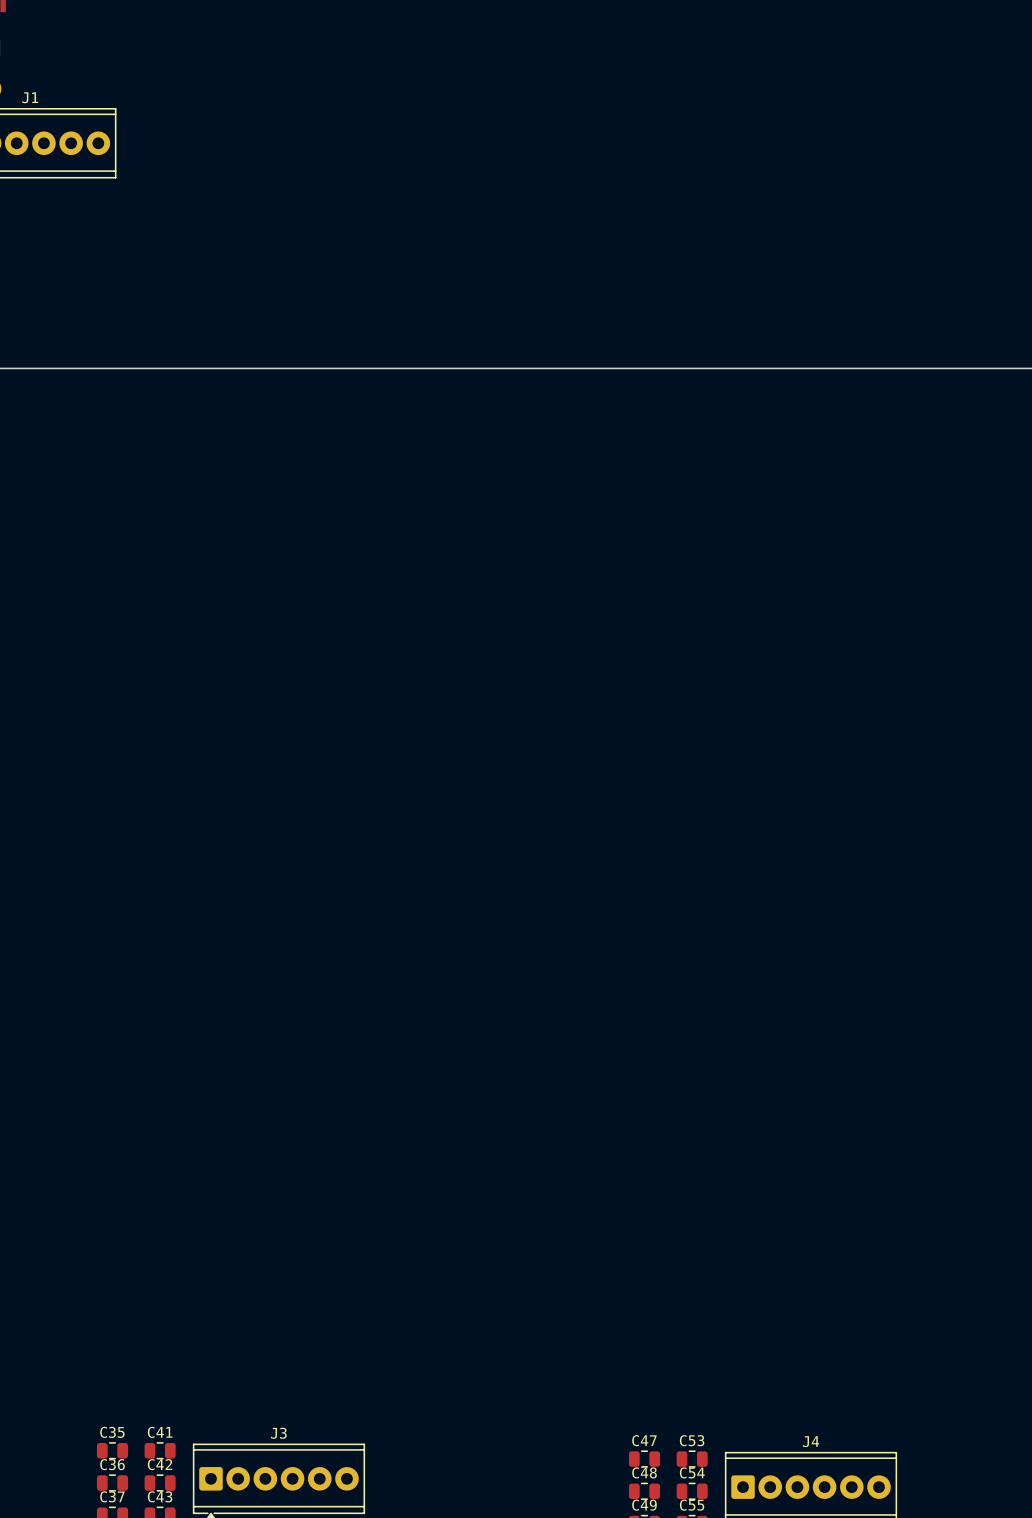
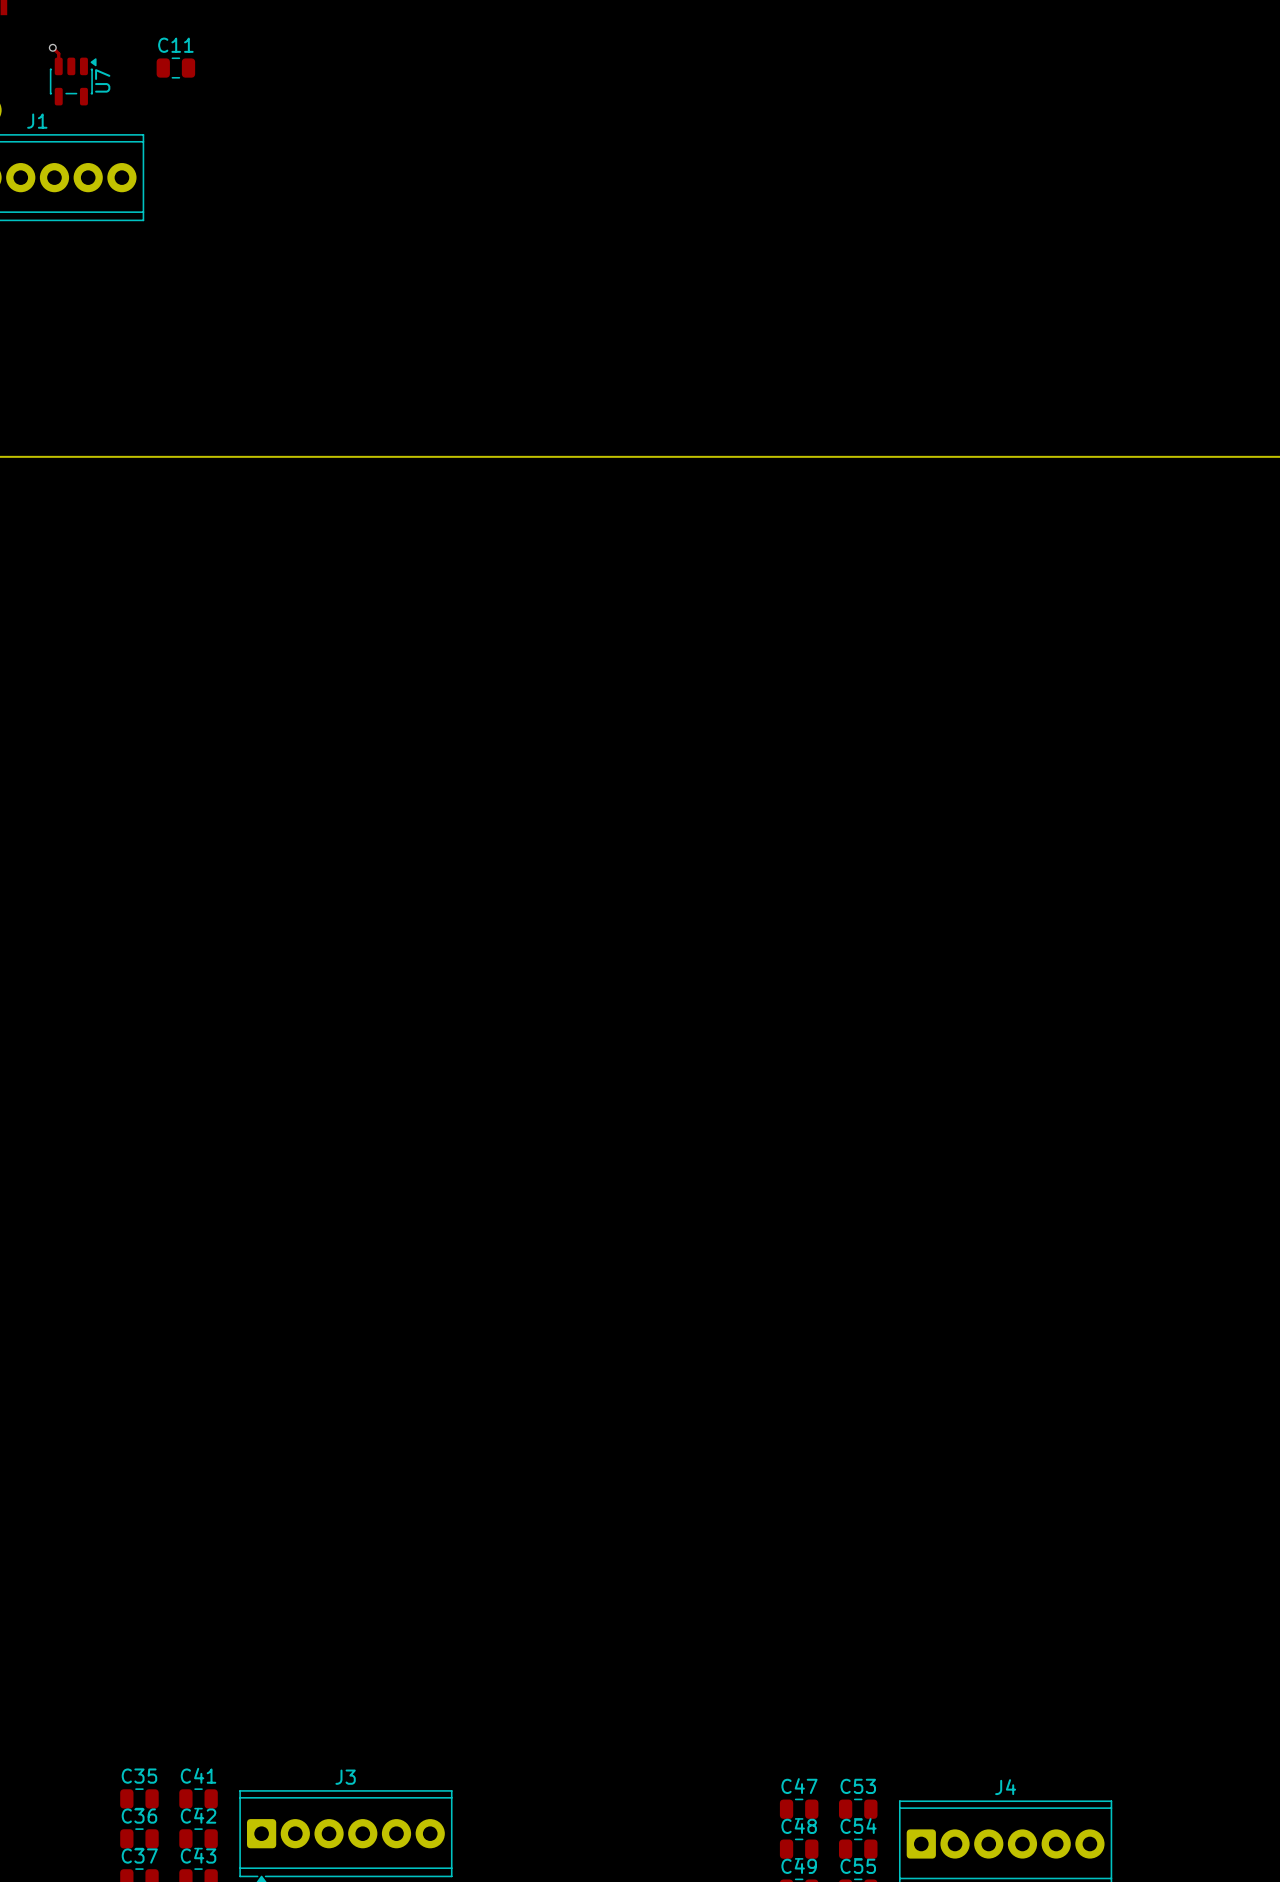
track: none -> (52, 47) (58, 53) (58, 66)
via: none -> (52, 47)
C11: none -> (175, 68)
U7: none -> (73, 81)

